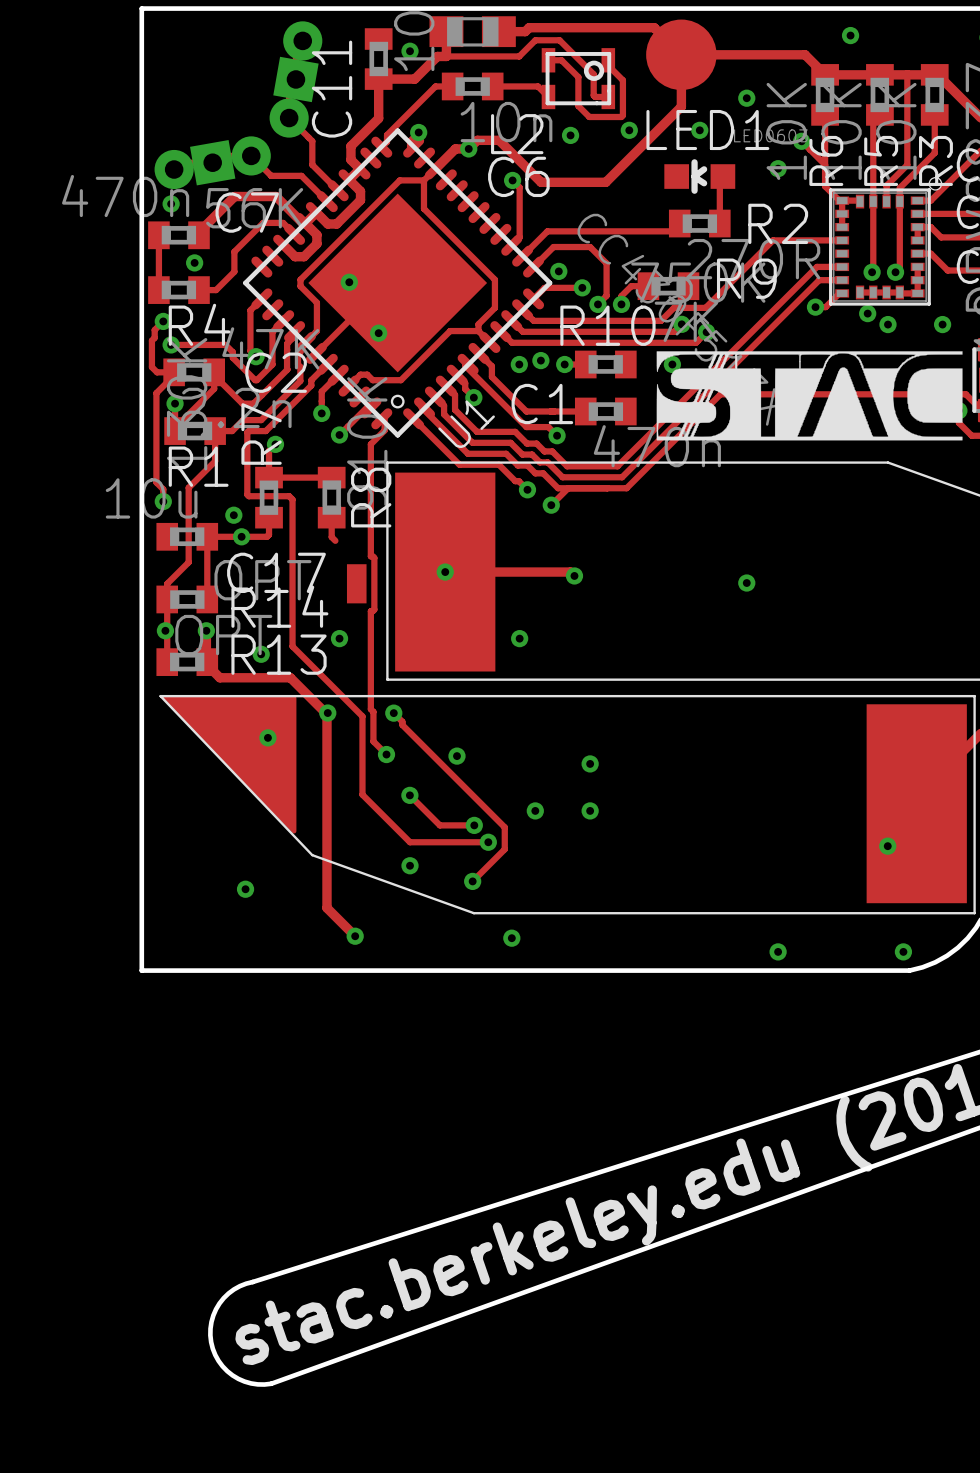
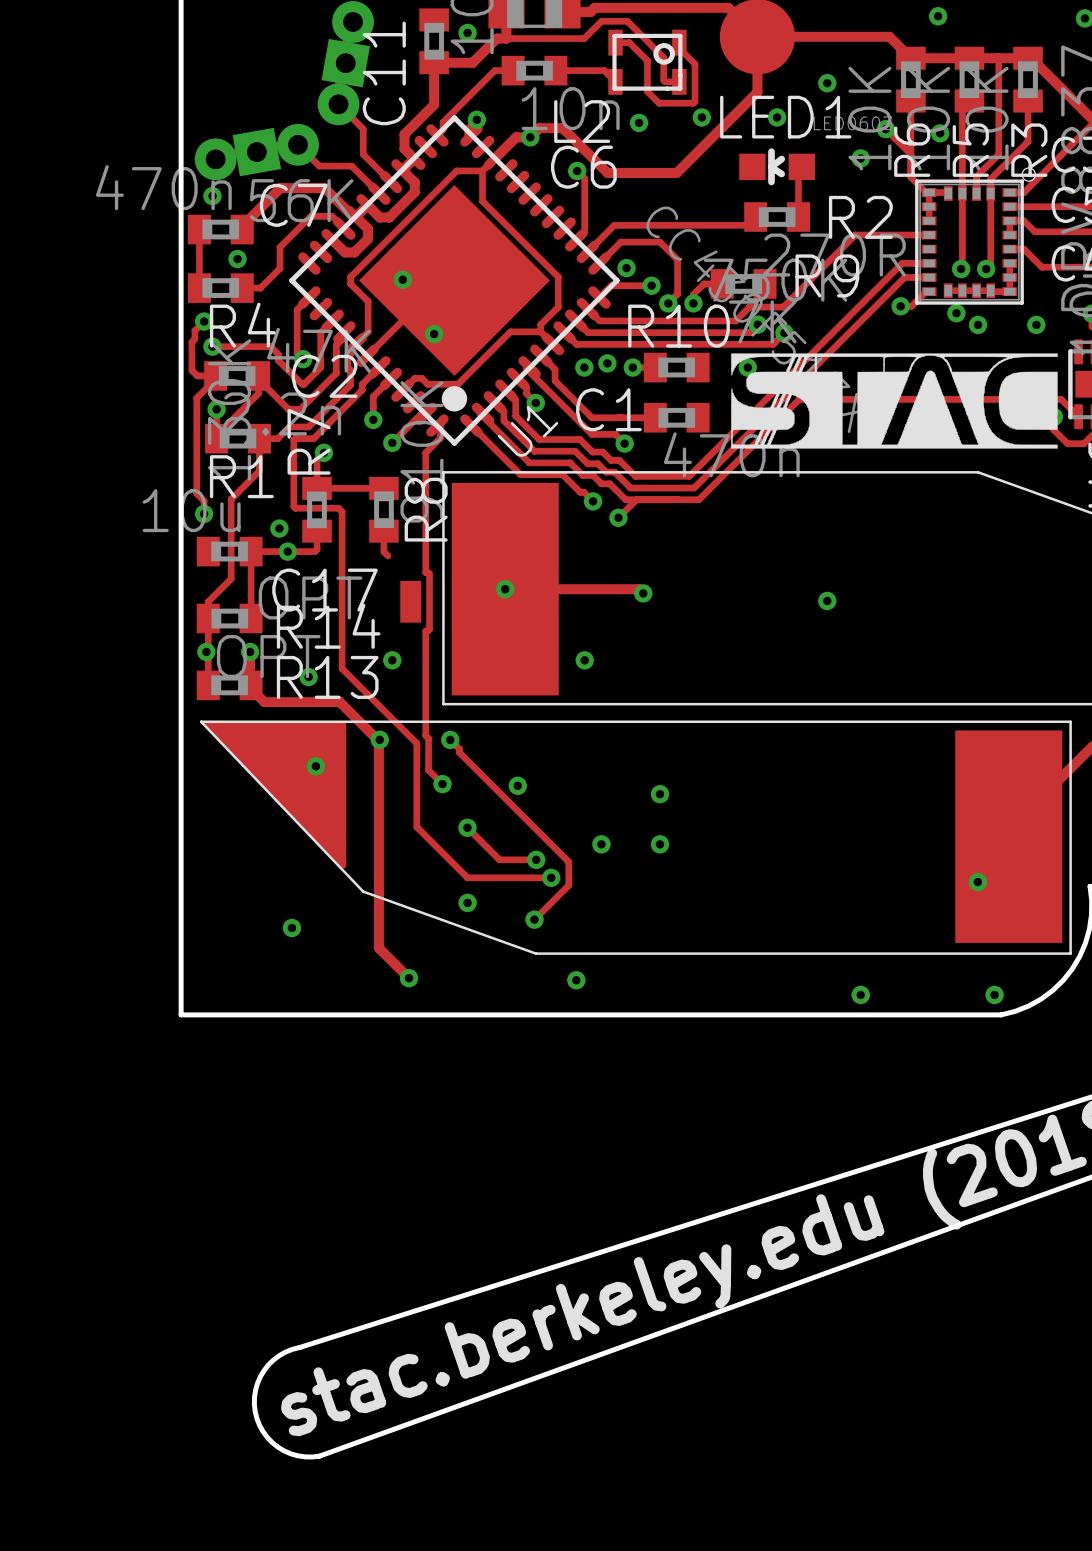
U1 footprint: [243, 128, 553, 438] -> [289, 115, 620, 446]
via: none -> (940, 133)

